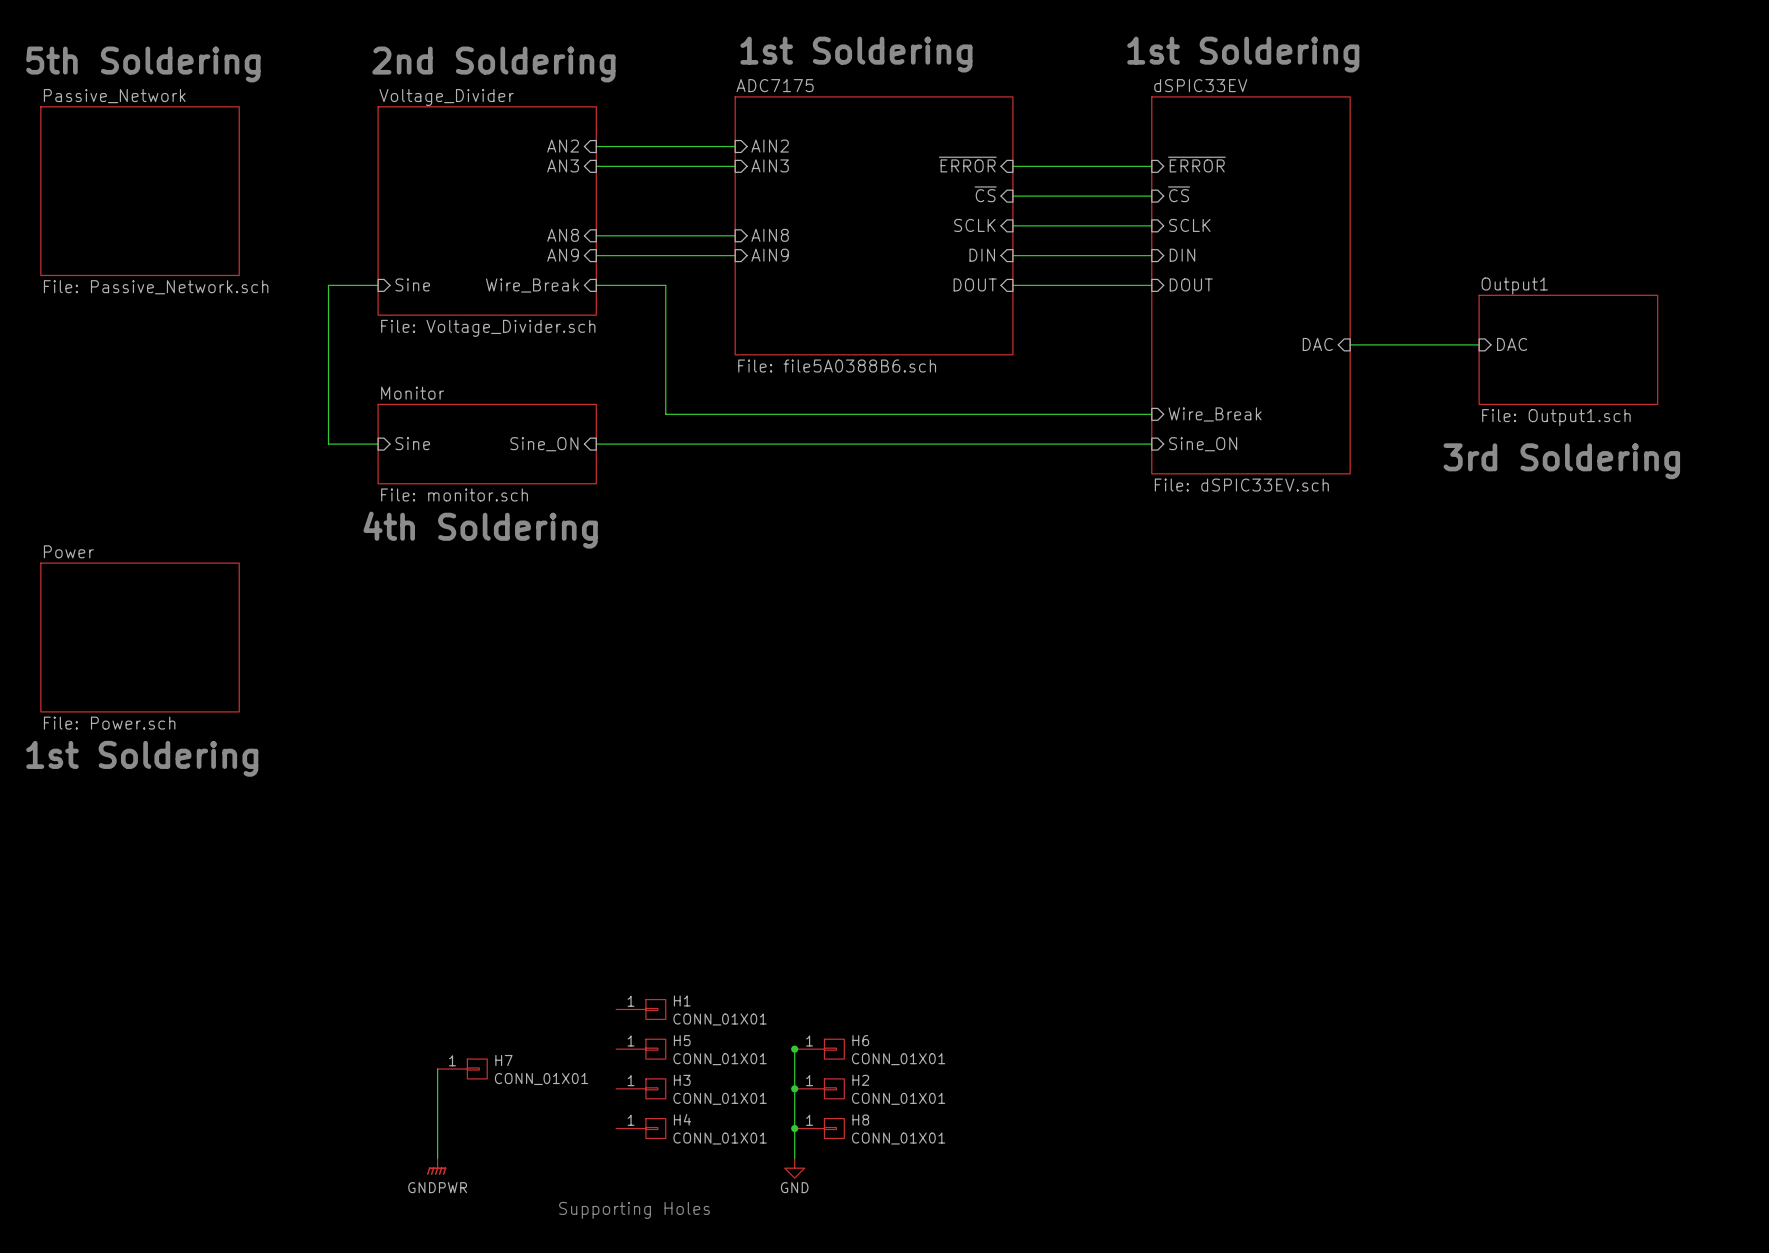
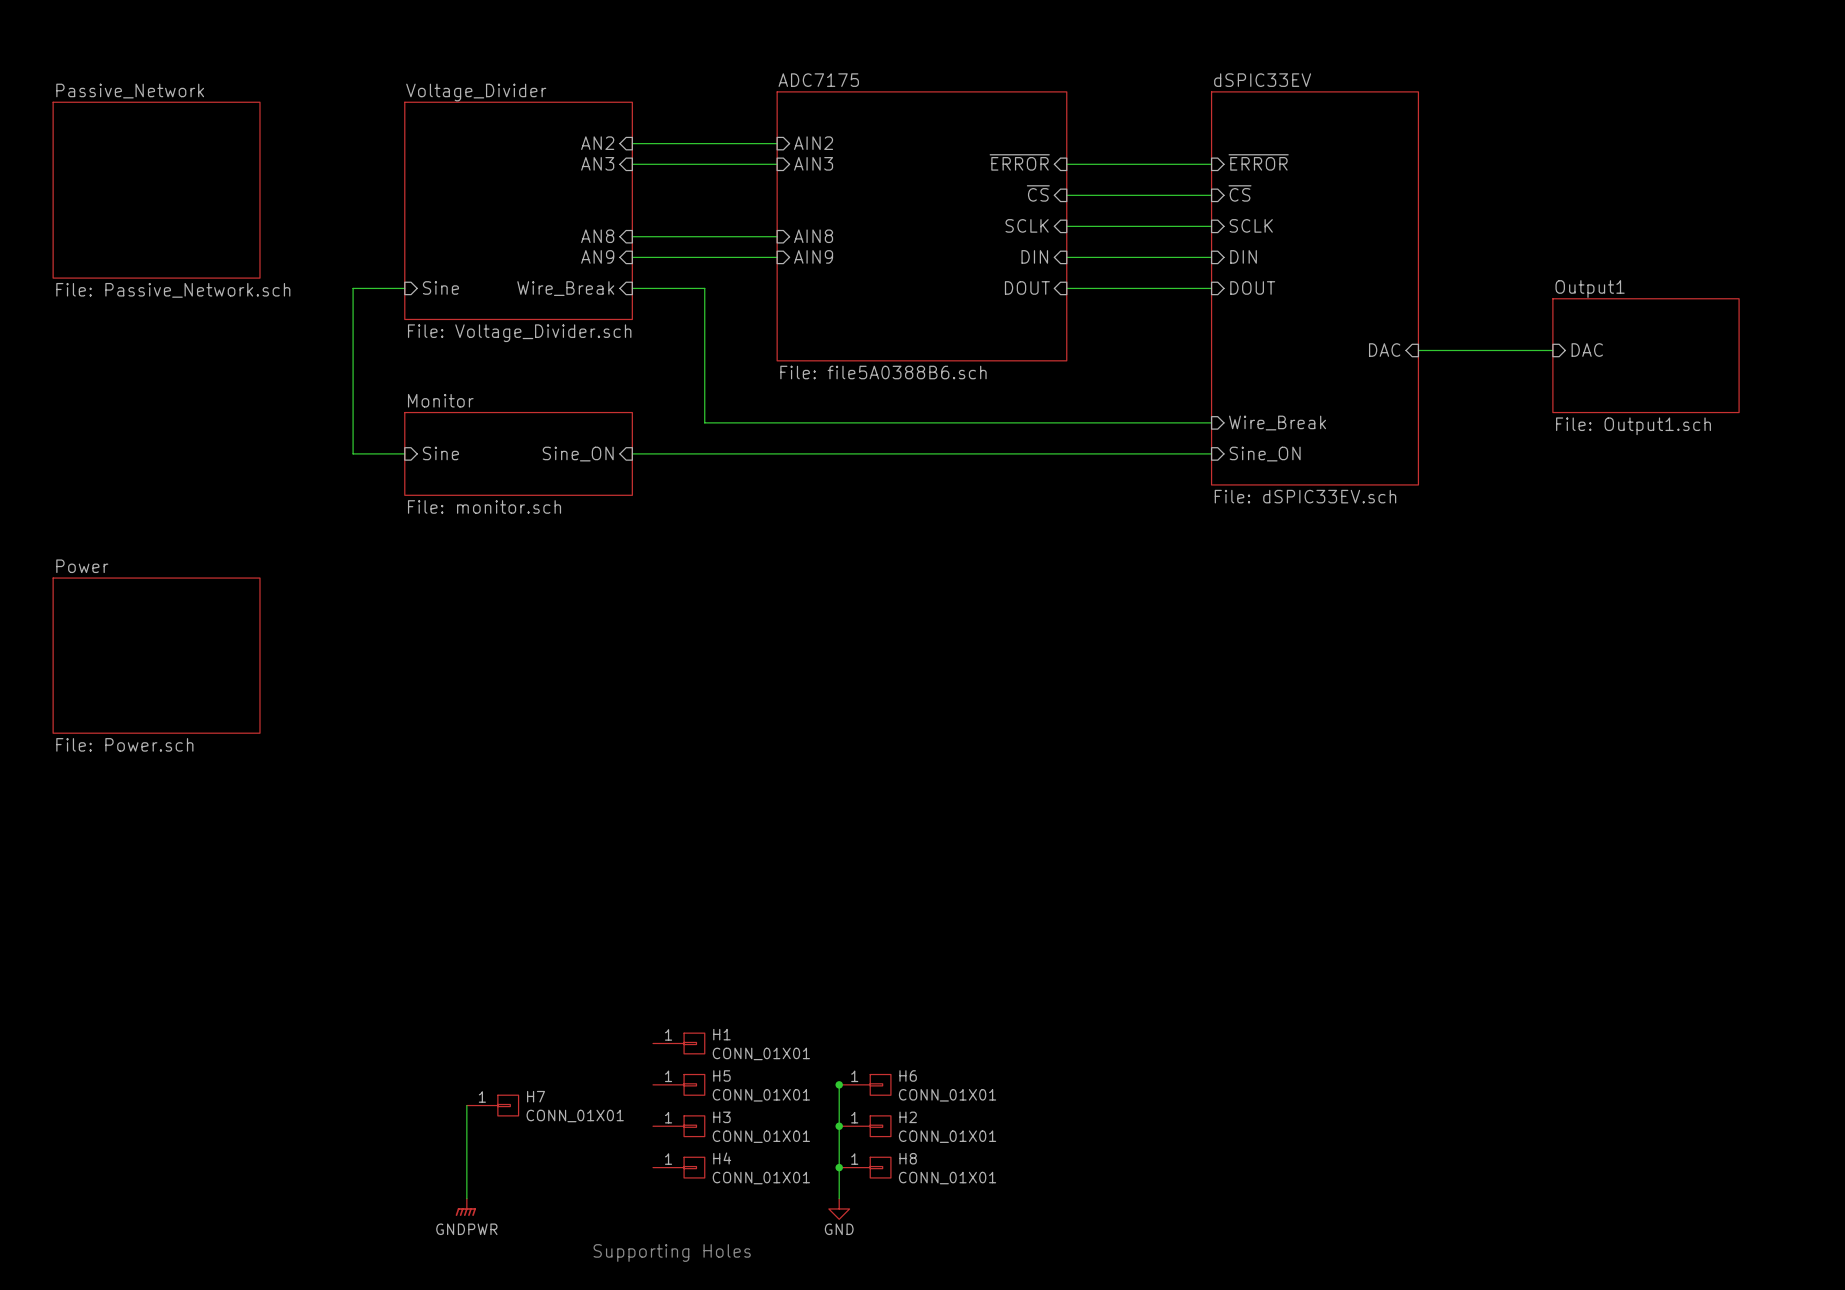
text: 1st Soldering (856, 54) -> none
text: 1st Soldering (1243, 54) -> none
text: 5th Soldering (143, 64) -> none
text: 2nd Soldering (493, 64) -> none
text: 3rd Soldering (1561, 461) -> none
text: 4th Soldering (480, 530) -> none
text: 1st Soldering (142, 758) -> none

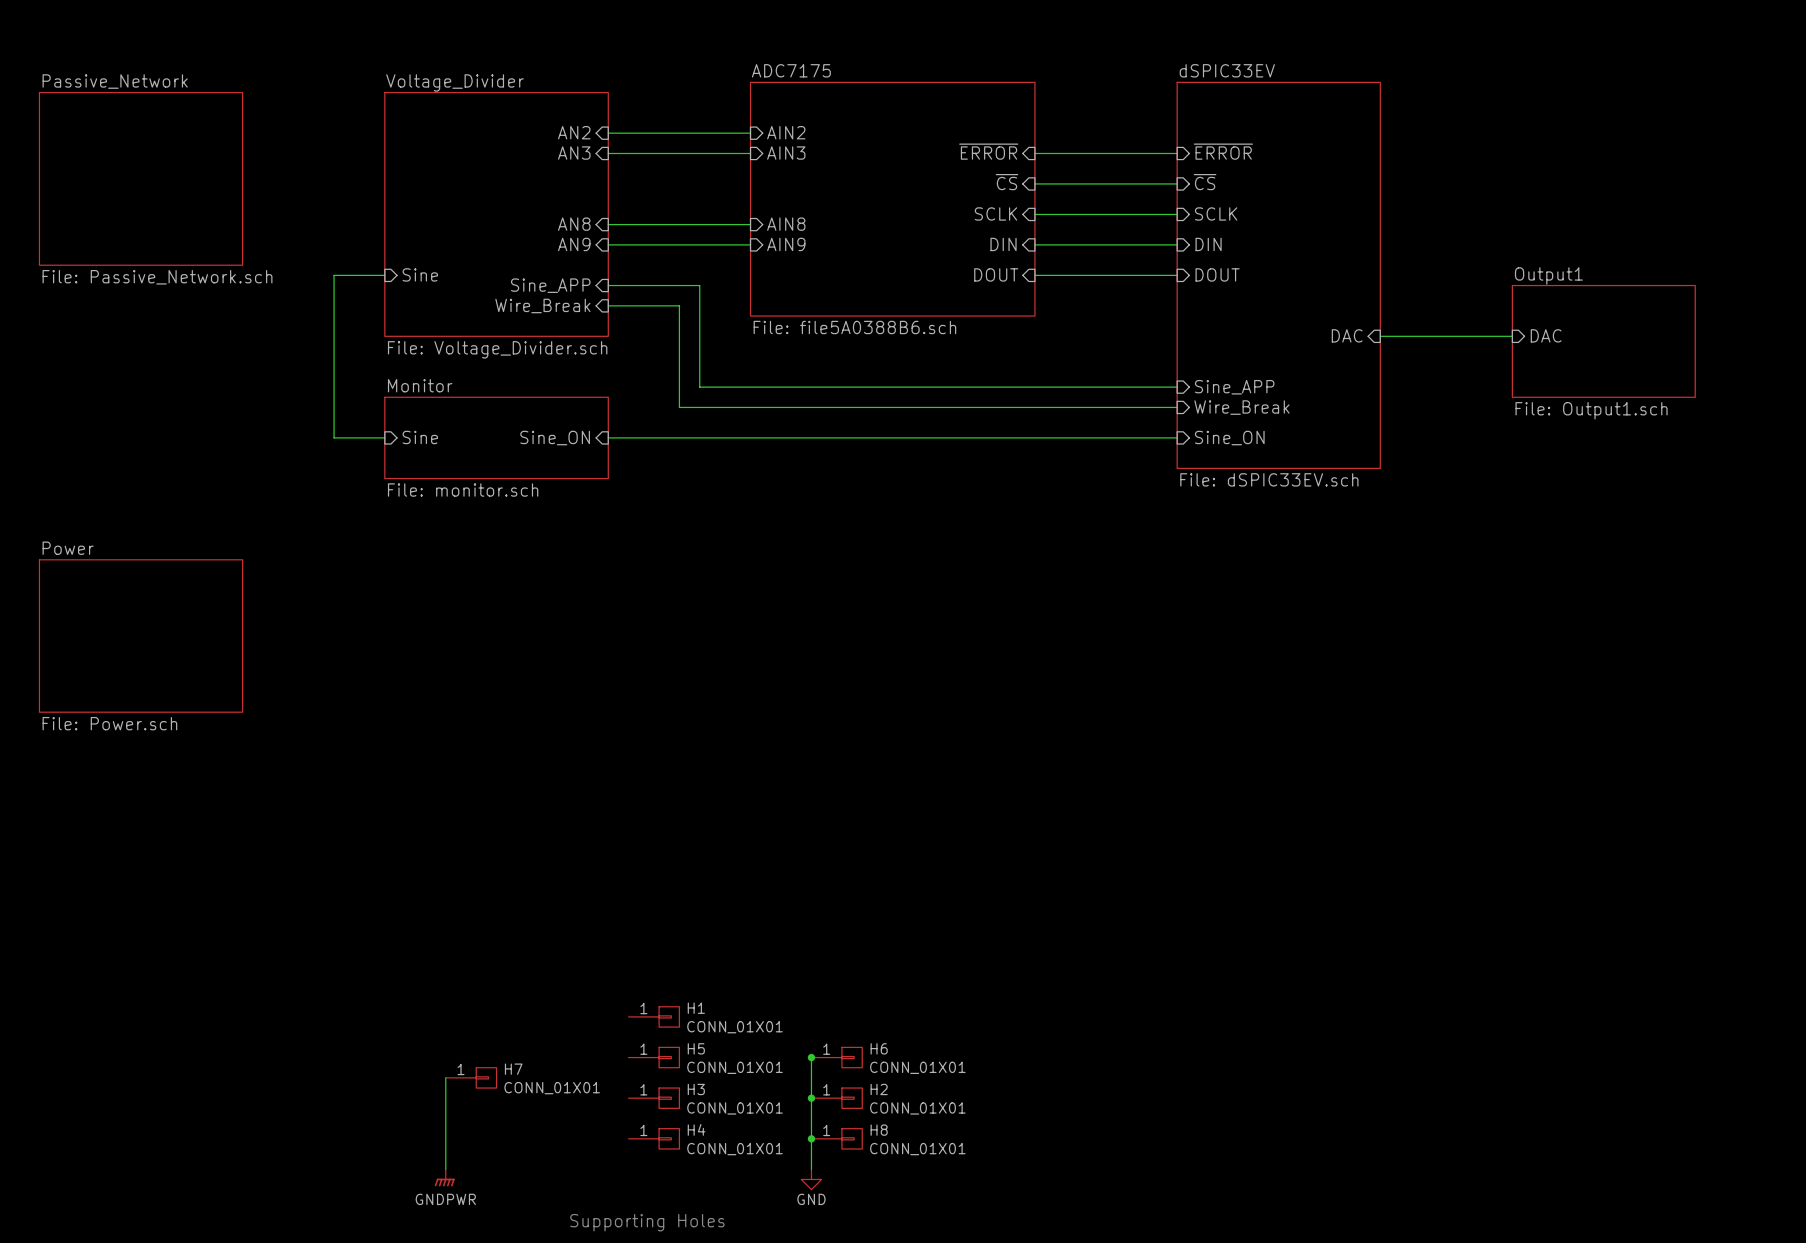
sheet ADC7175 shape: [777, 91, 1067, 361] -> [750, 82, 1035, 317]
sheet Voltage_Divider: File: Voltage_Divider.sch (518, 210) -> none
sheet Voltage_Divider: none -> File: Voltage_Divider.sch (496, 214)
sheet pin position: Wire_Break (565, 288) -> Wire_Break (542, 305)
wire: (632, 288) (704, 288) (704, 319) -> (608, 305) (679, 305)
sheet pin: none -> Sine_APP (550, 285)
wire: none -> (608, 285) (699, 285) (699, 387) (1177, 387)
sheet pin: none -> Sine_APP (1234, 387)

